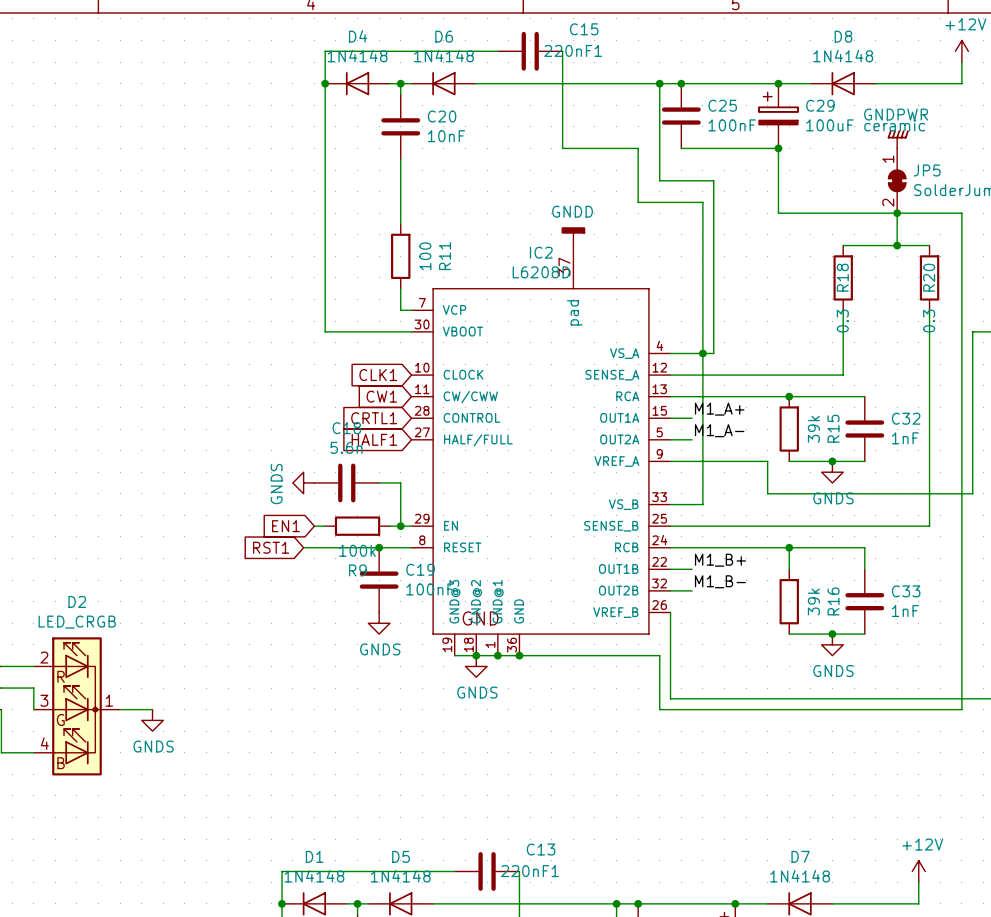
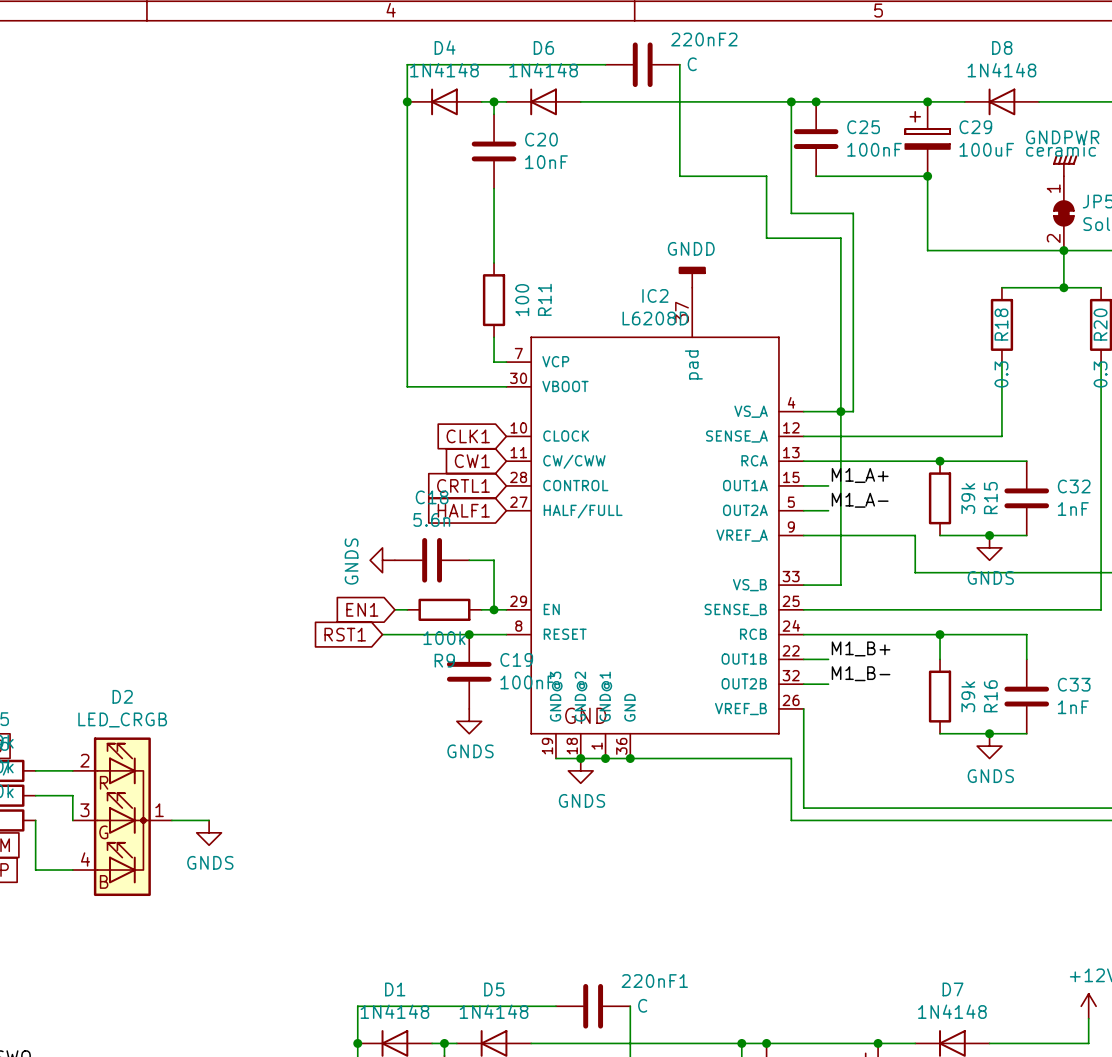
C15 name: C15 (584, 29) -> 220nF2 (704, 39)
C15 value: 220nF1 (573, 50) -> C (692, 64)
C13 name: C13 (541, 849) -> 220nF1 (654, 981)
C13 value: 220nF1 (529, 871) -> C (642, 1005)

